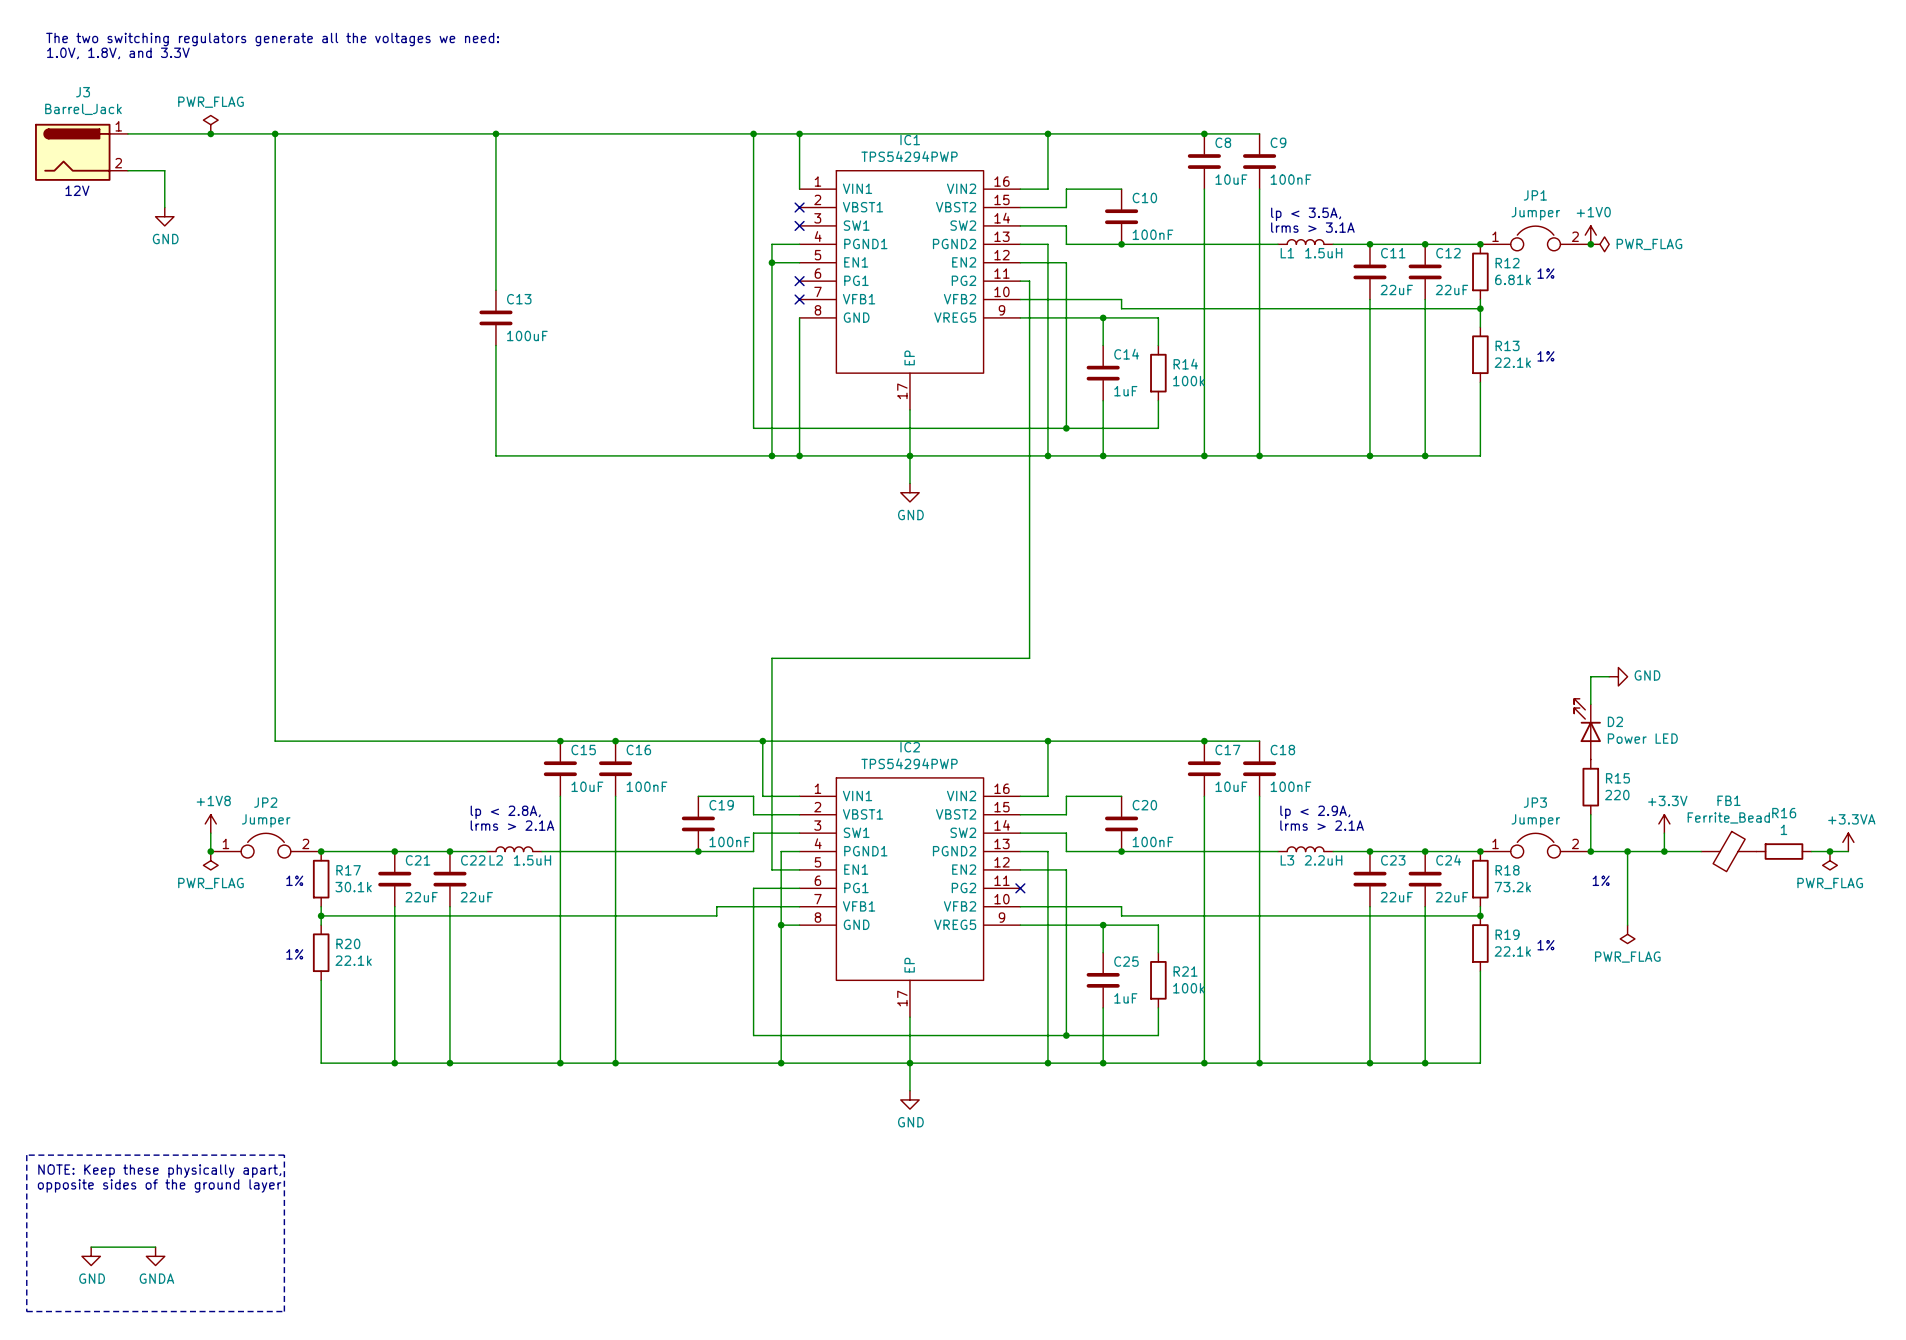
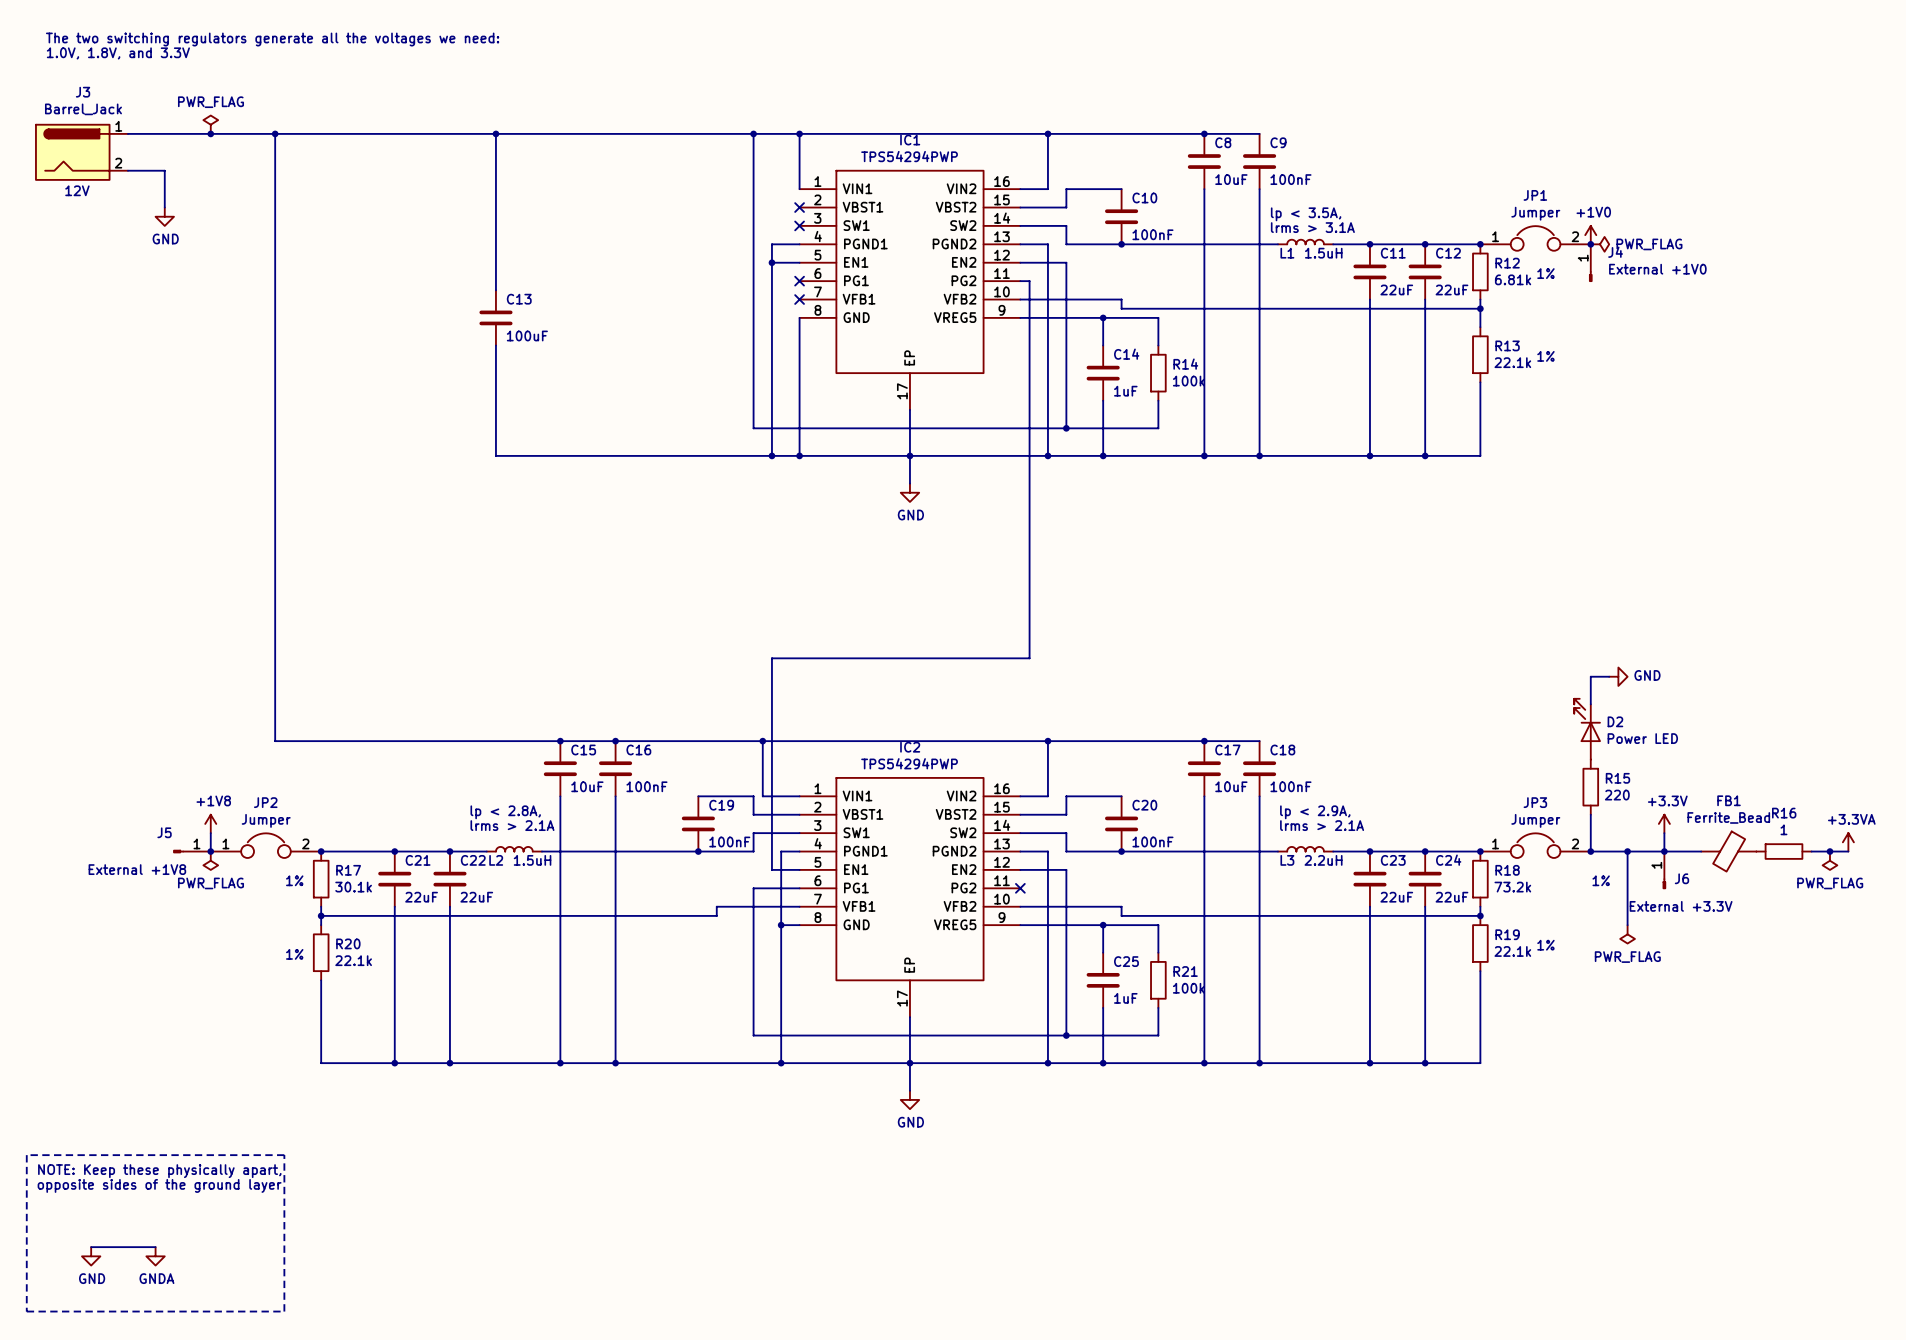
J4: none -> External +1V0 (1590, 263)
J5: none -> External +1V8 (192, 851)
J6: none -> External +3.3V (1664, 870)

